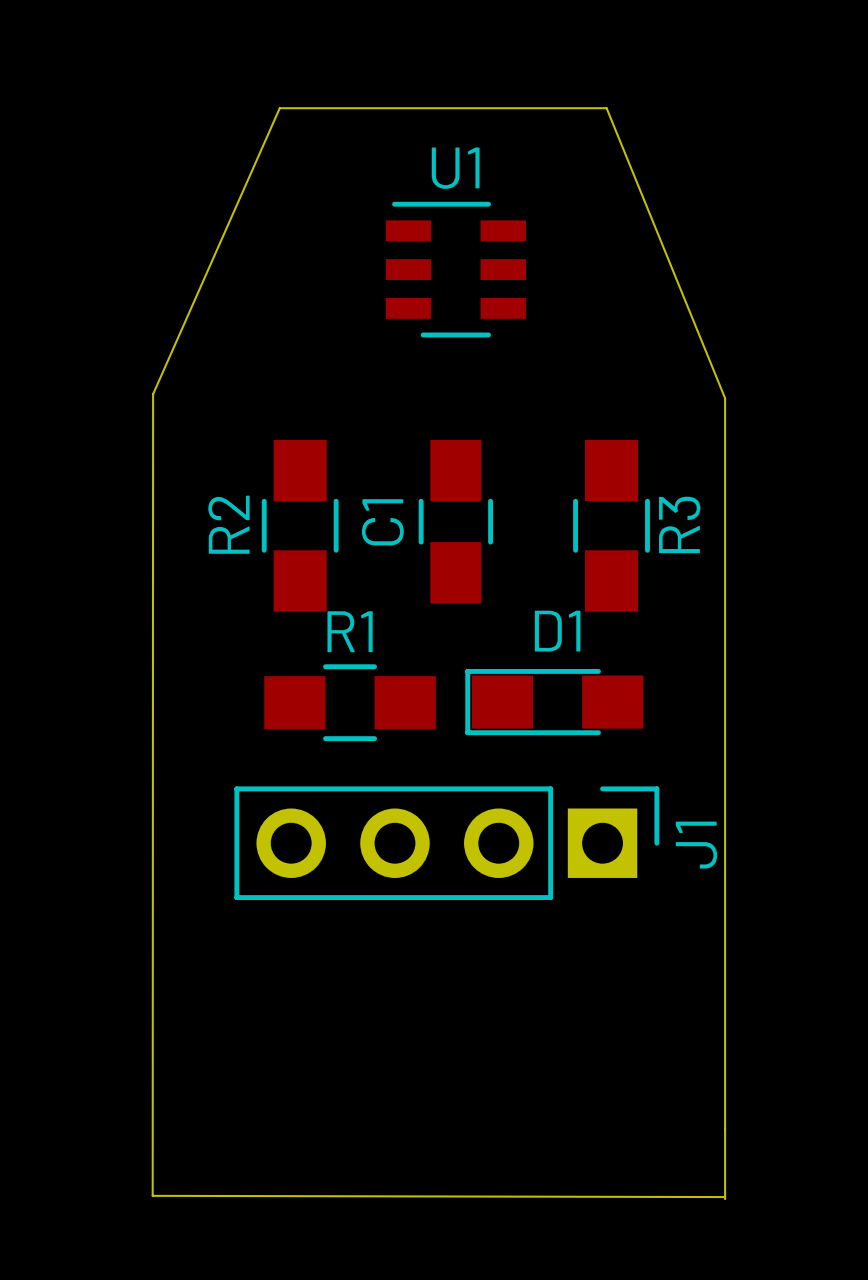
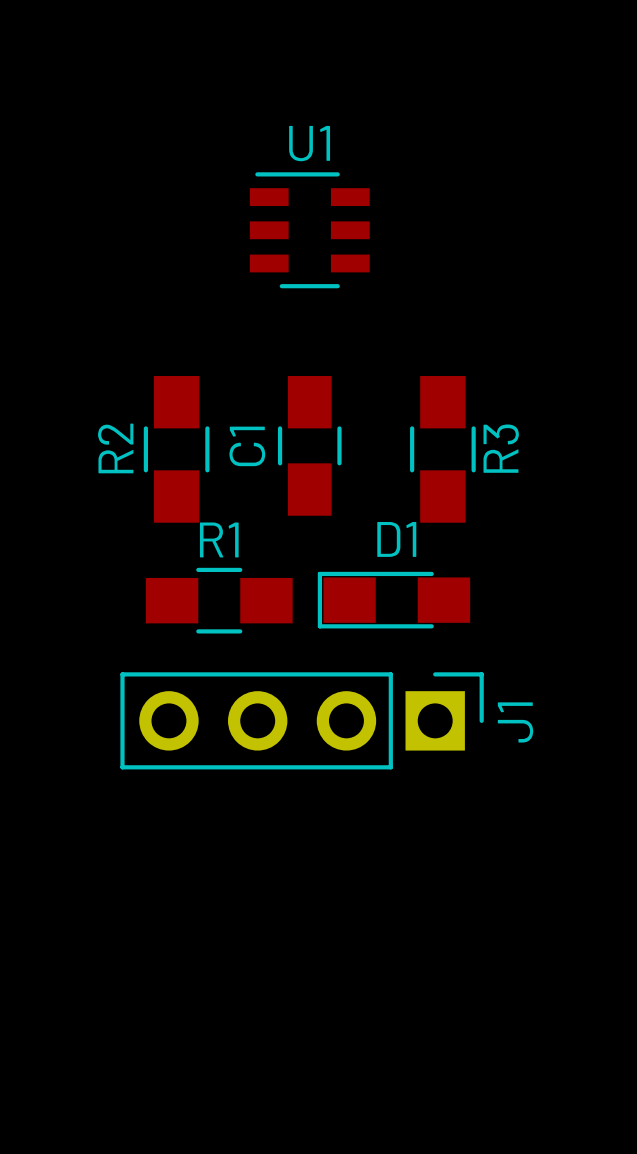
board edge: (724, 1197) (152, 1195) (153, 394) (279, 108) (606, 108) (725, 398) (725, 1199) -> none

